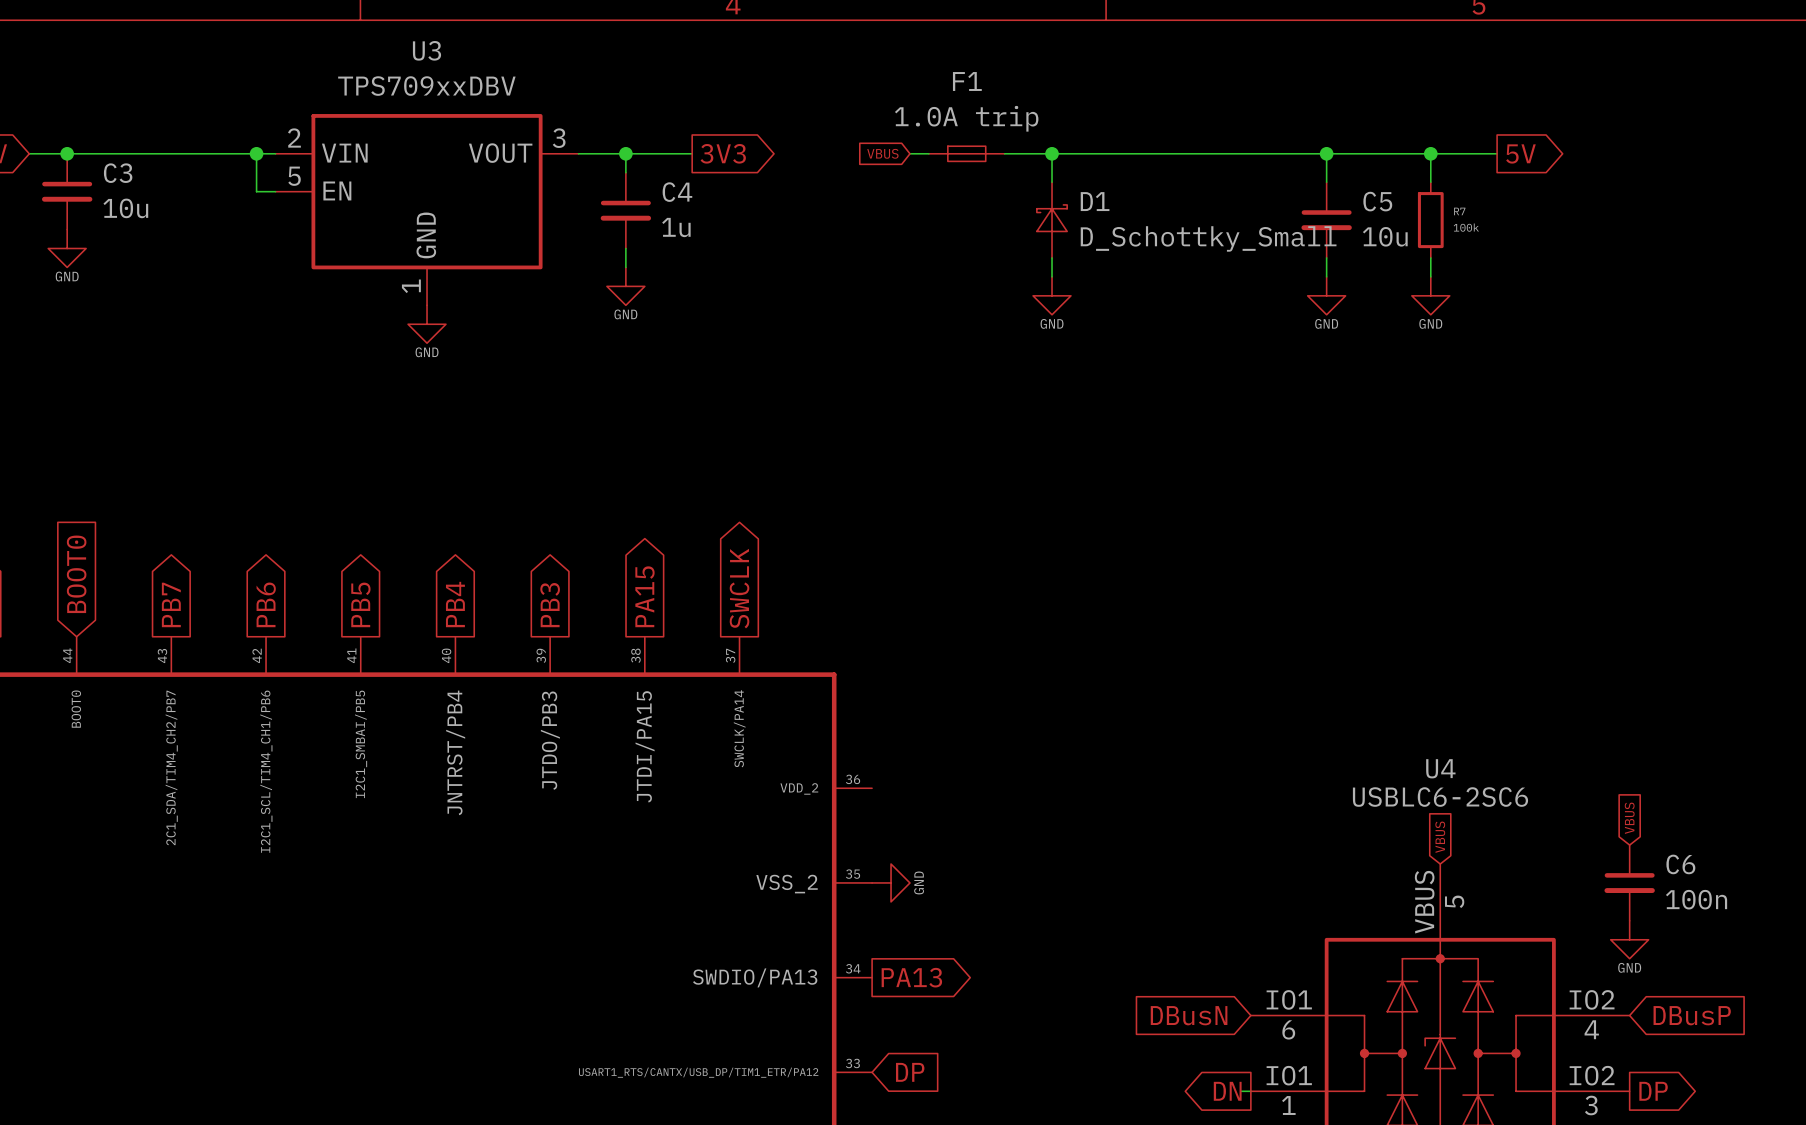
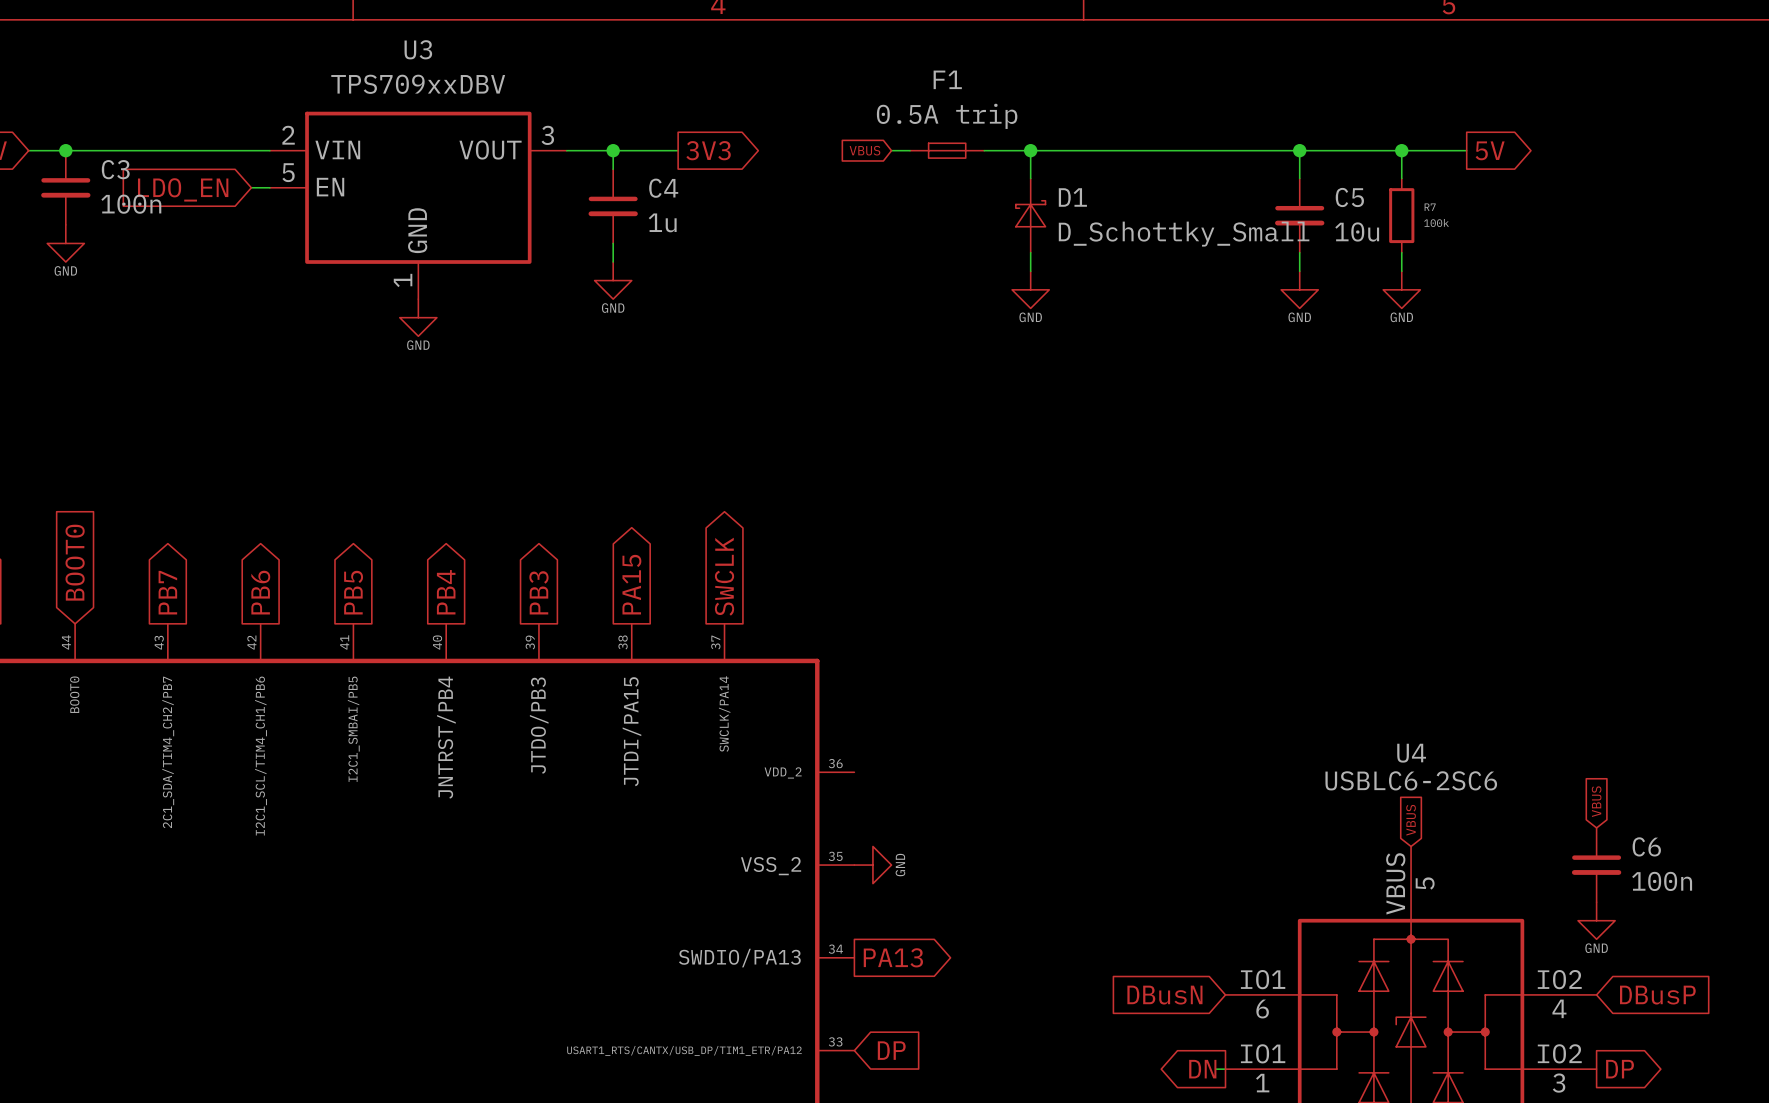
F1 value: 1.0A trip (966, 118) -> 0.5A trip (947, 116)
wire: (256, 153) (256, 191) -> none
junction: (256, 153) -> none
global label: none -> LDO_EN (183, 189)
C3 value: 10u (125, 208) -> 100n (131, 204)

